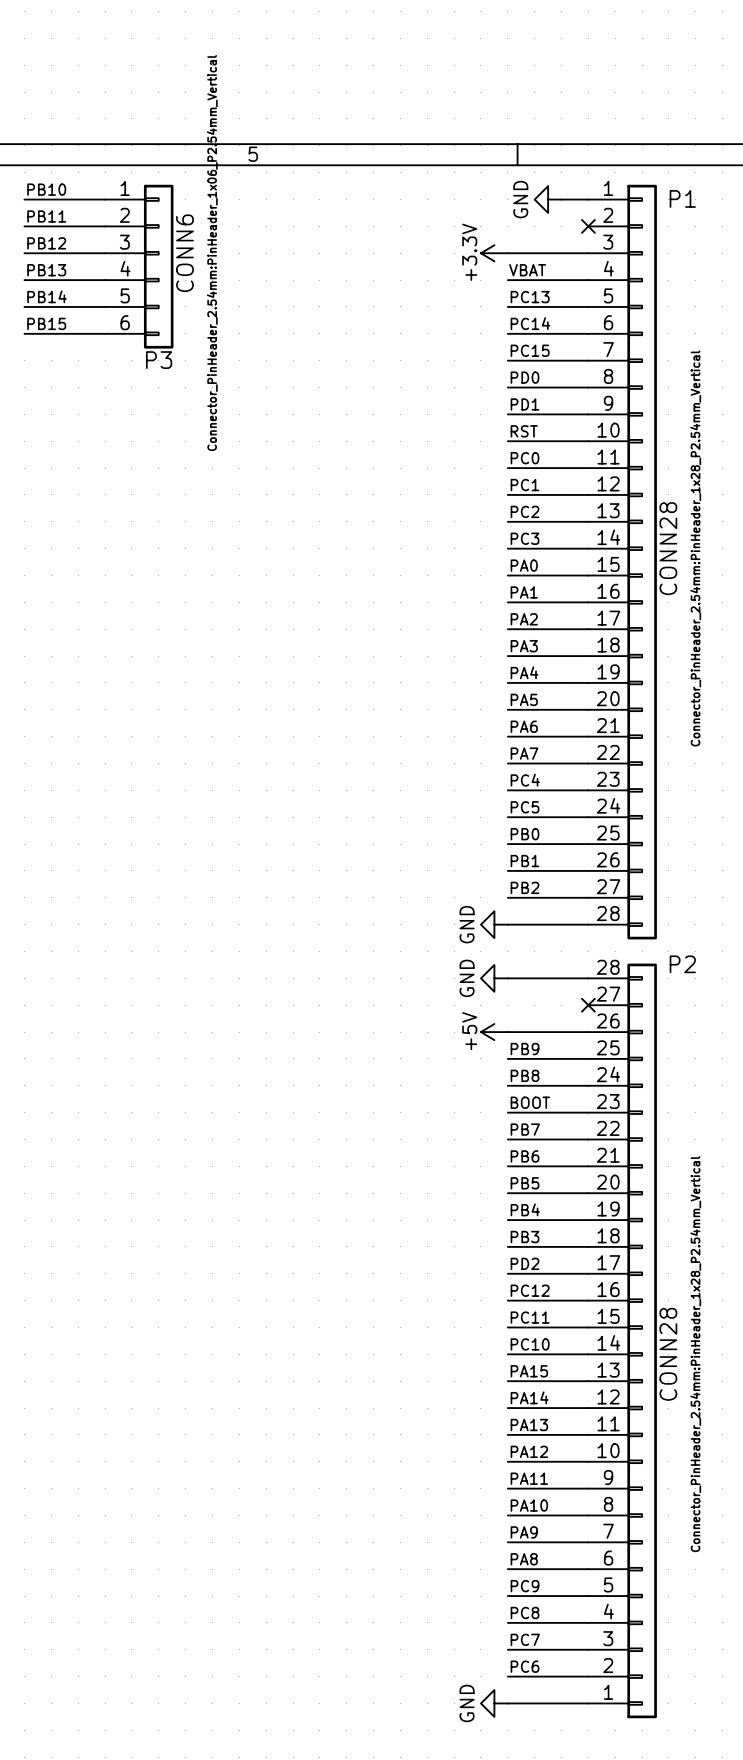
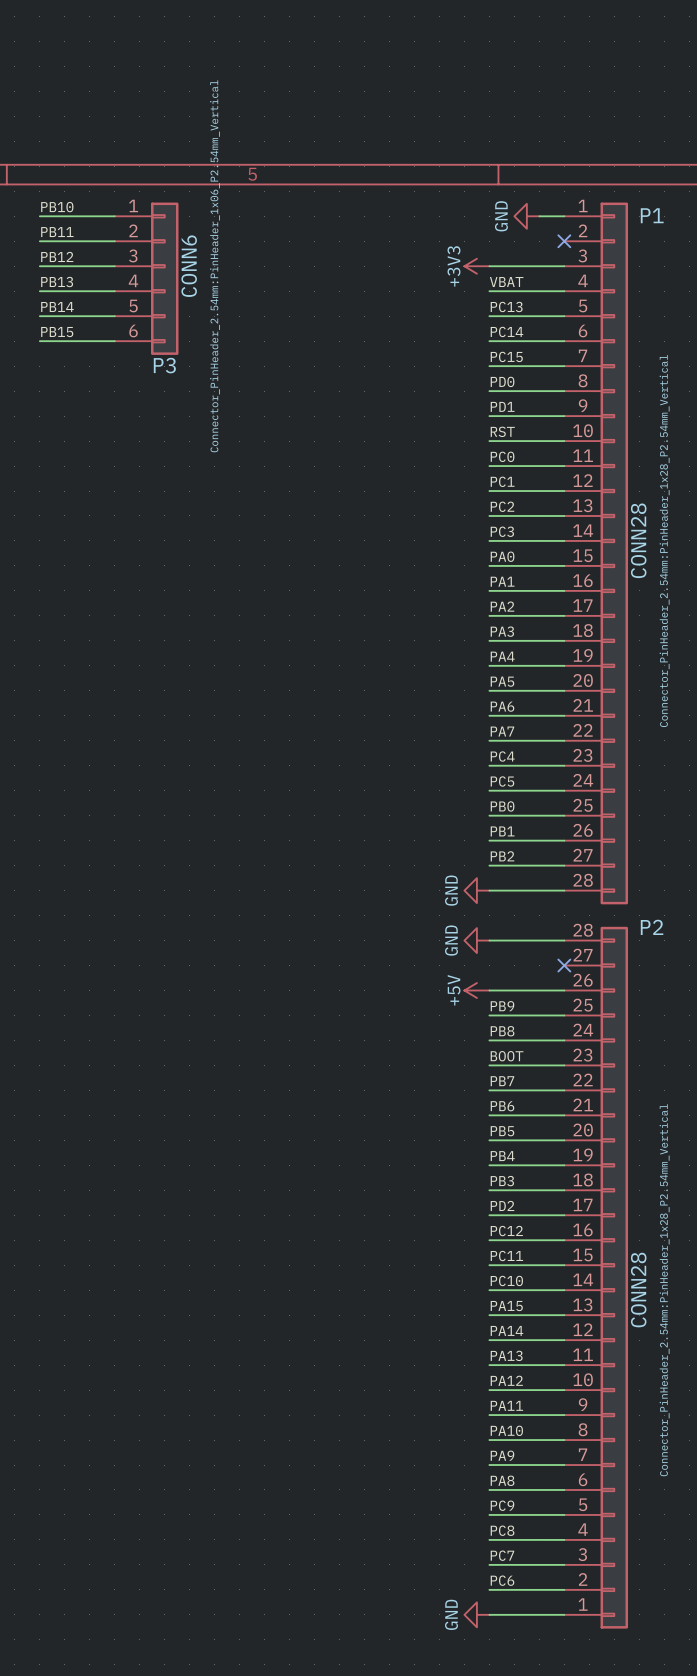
power symbol: +3.3V (494, 253) -> +3V3 (476, 266)

